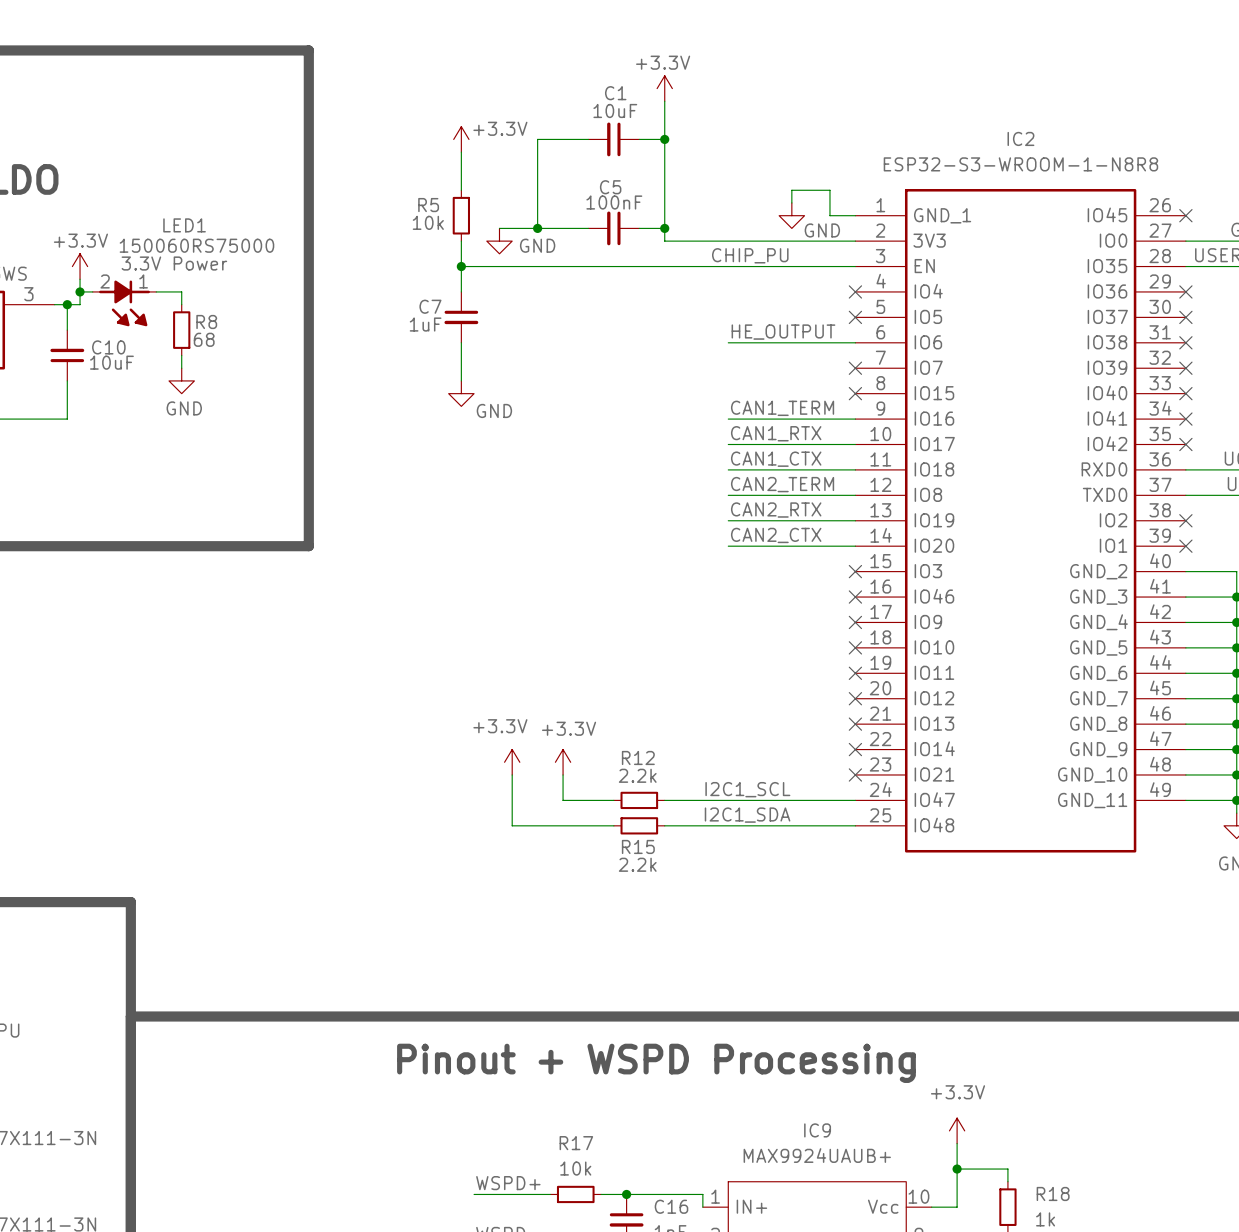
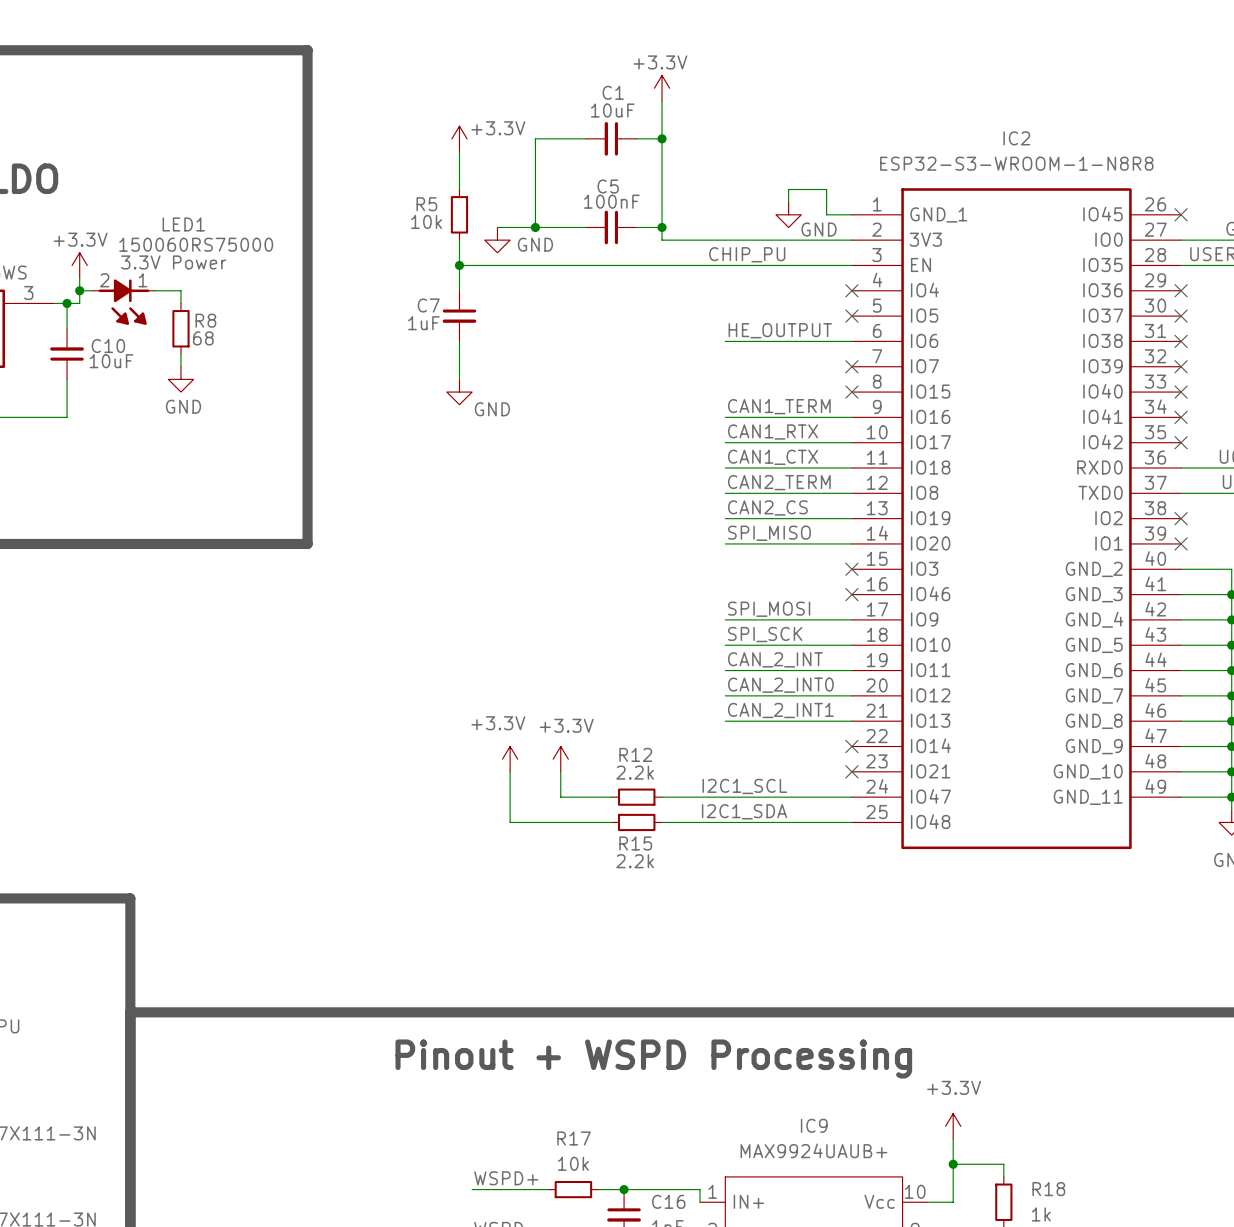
label: CAN2_RTX (776, 510) -> CAN2_CS (767, 507)
label: CAN2_CTX (776, 535) -> SPI_MISO (769, 533)
label: none -> SPI_MOSI (769, 609)
wire: none -> (725, 619) (851, 619)
no-connect mark: (855, 622) -> none
label: none -> SPI_SCK (765, 634)
wire: none -> (725, 645) (851, 645)
no-connect mark: (855, 647) -> none
label: none -> CAN_2_INT (775, 659)
wire: none -> (725, 670) (851, 670)
no-connect mark: (855, 673) -> none
label: none -> CAN_2_INT0 (780, 685)
wire: none -> (725, 695) (851, 695)
no-connect mark: (855, 698) -> none
label: none -> CAN_2_INT1 (780, 710)
wire: none -> (725, 721) (851, 721)
no-connect mark: (855, 724) -> none

